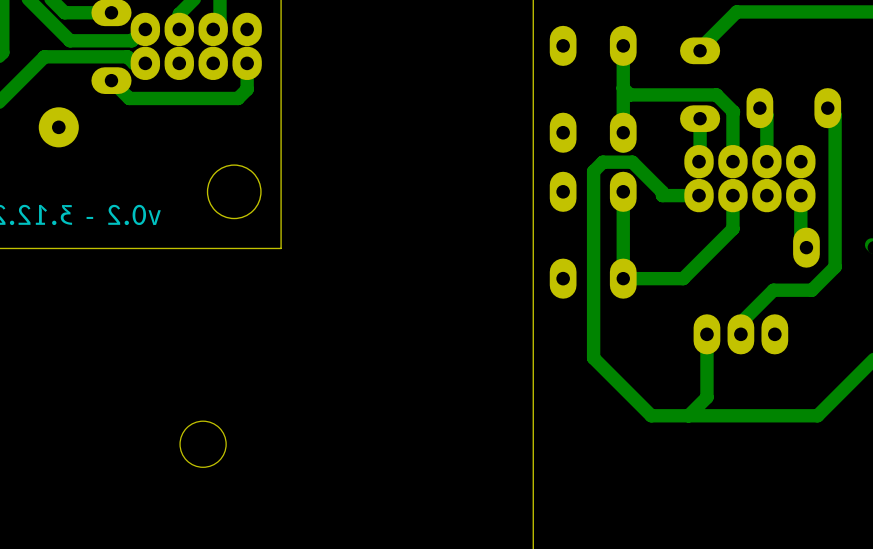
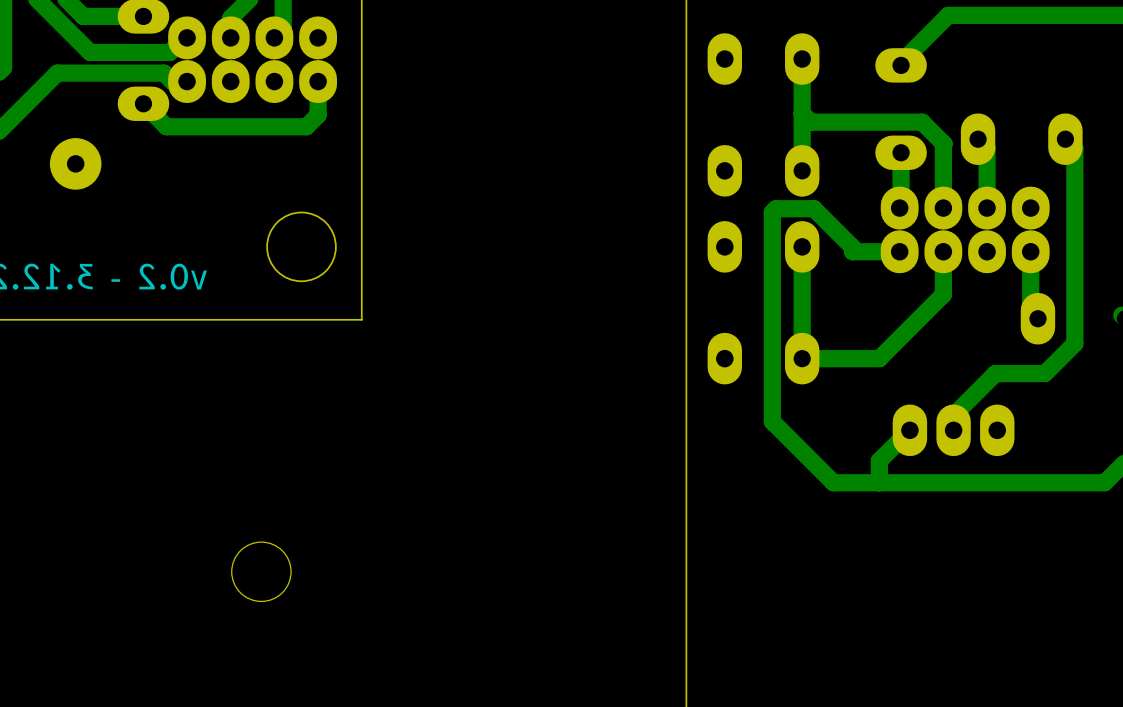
track: (600, 164) (593, 171) (593, 358) (651, 415) (817, 415) (858, 375) -> (772, 212) (772, 421) (833, 482) (1104, 482)
track: (706, 334) (706, 397) (688, 415) -> (909, 430) (879, 460) (879, 482)

